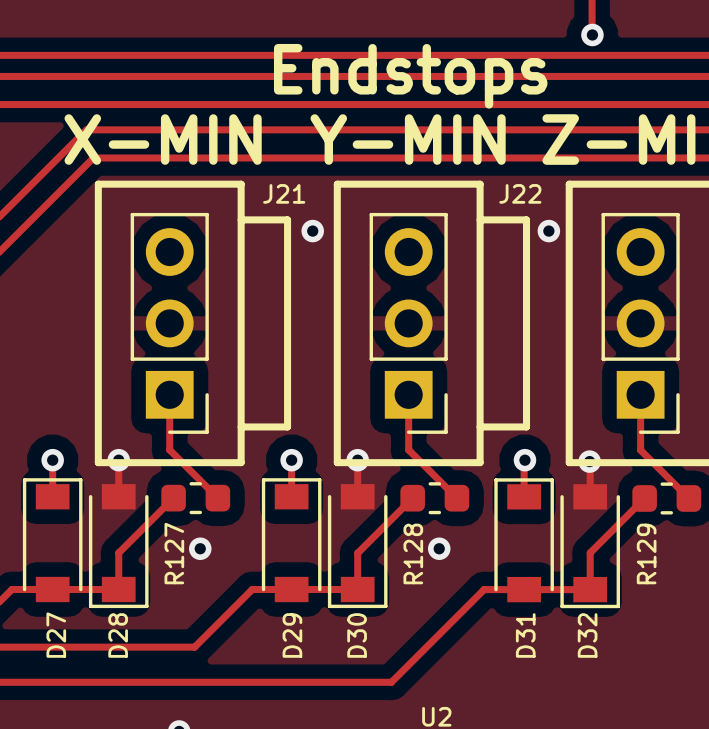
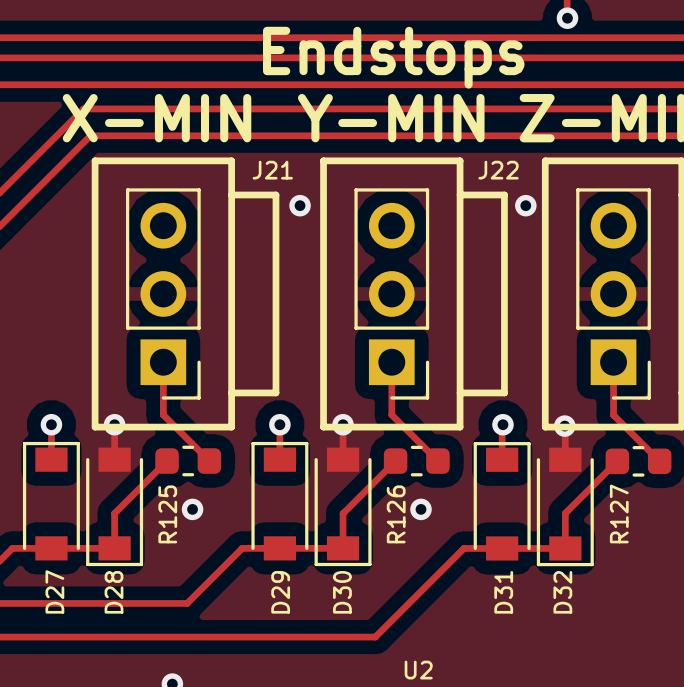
R127 name: R127 (174, 553) -> R125 (167, 514)
R128 name: R128 (413, 553) -> R126 (396, 514)
R129 name: R129 (646, 553) -> R127 (619, 514)

